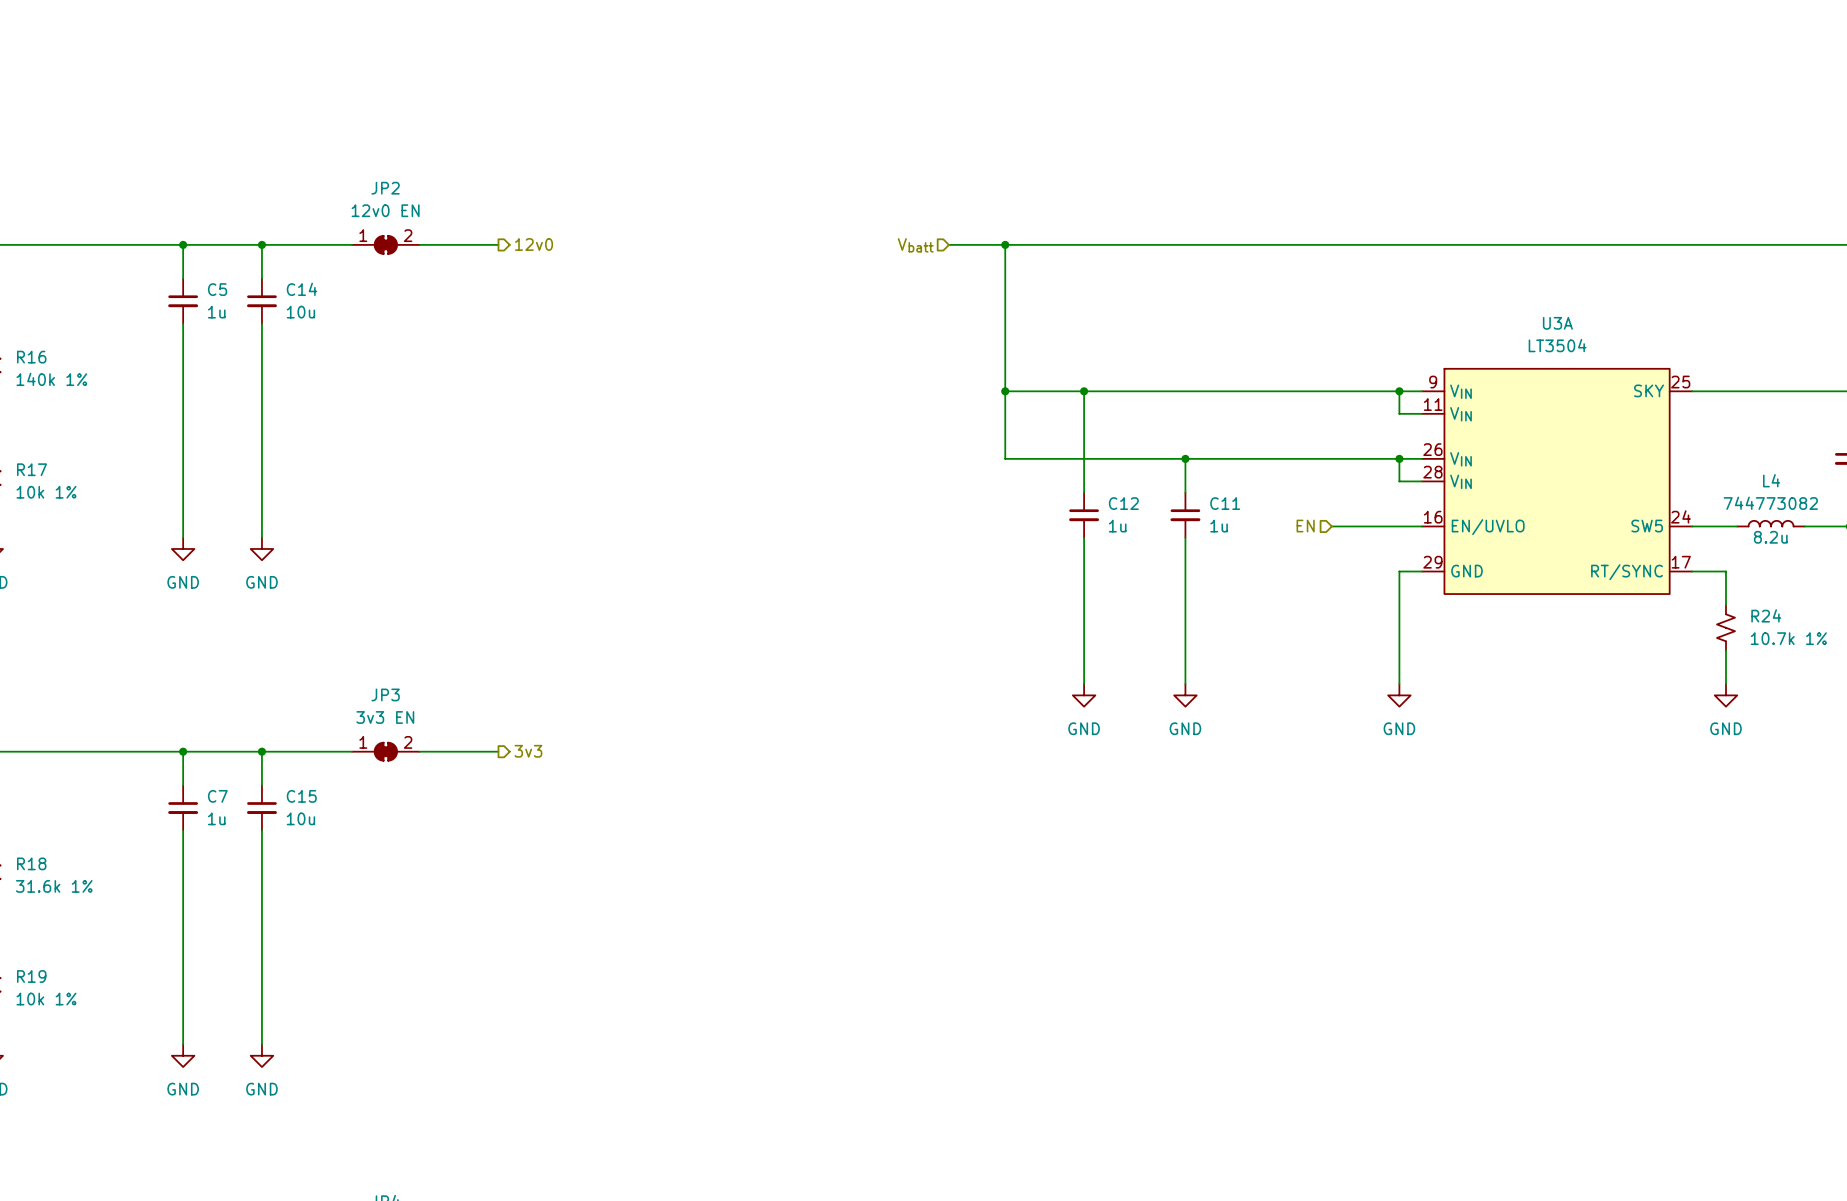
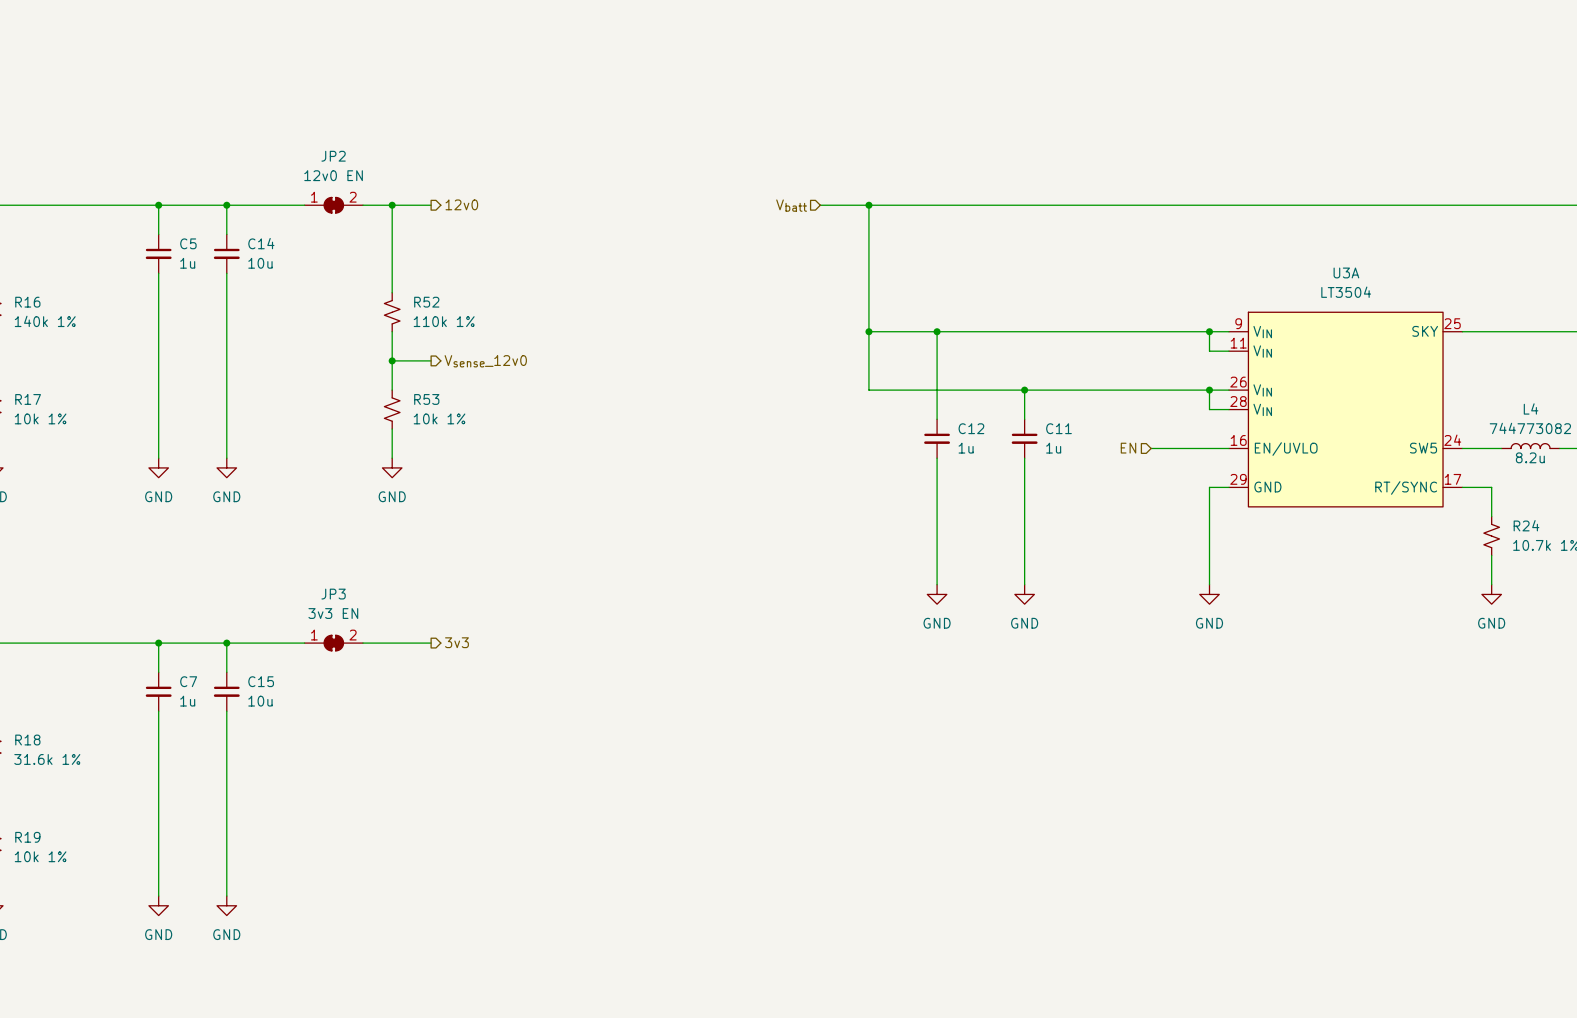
wire: none -> (392, 205) (392, 292)
junction: none -> (392, 205)
R52: none -> 110k 1% (392, 312)
wire: none -> (392, 331) (392, 390)
wire: none -> (392, 360) (431, 360)
junction: none -> (392, 360)
hierarchical label: none -> Vsense_12v0 (485, 361)
R53: none -> 10k 1% (392, 409)
wire: none -> (392, 429) (392, 458)
power symbol: none -> GND (392, 467)

